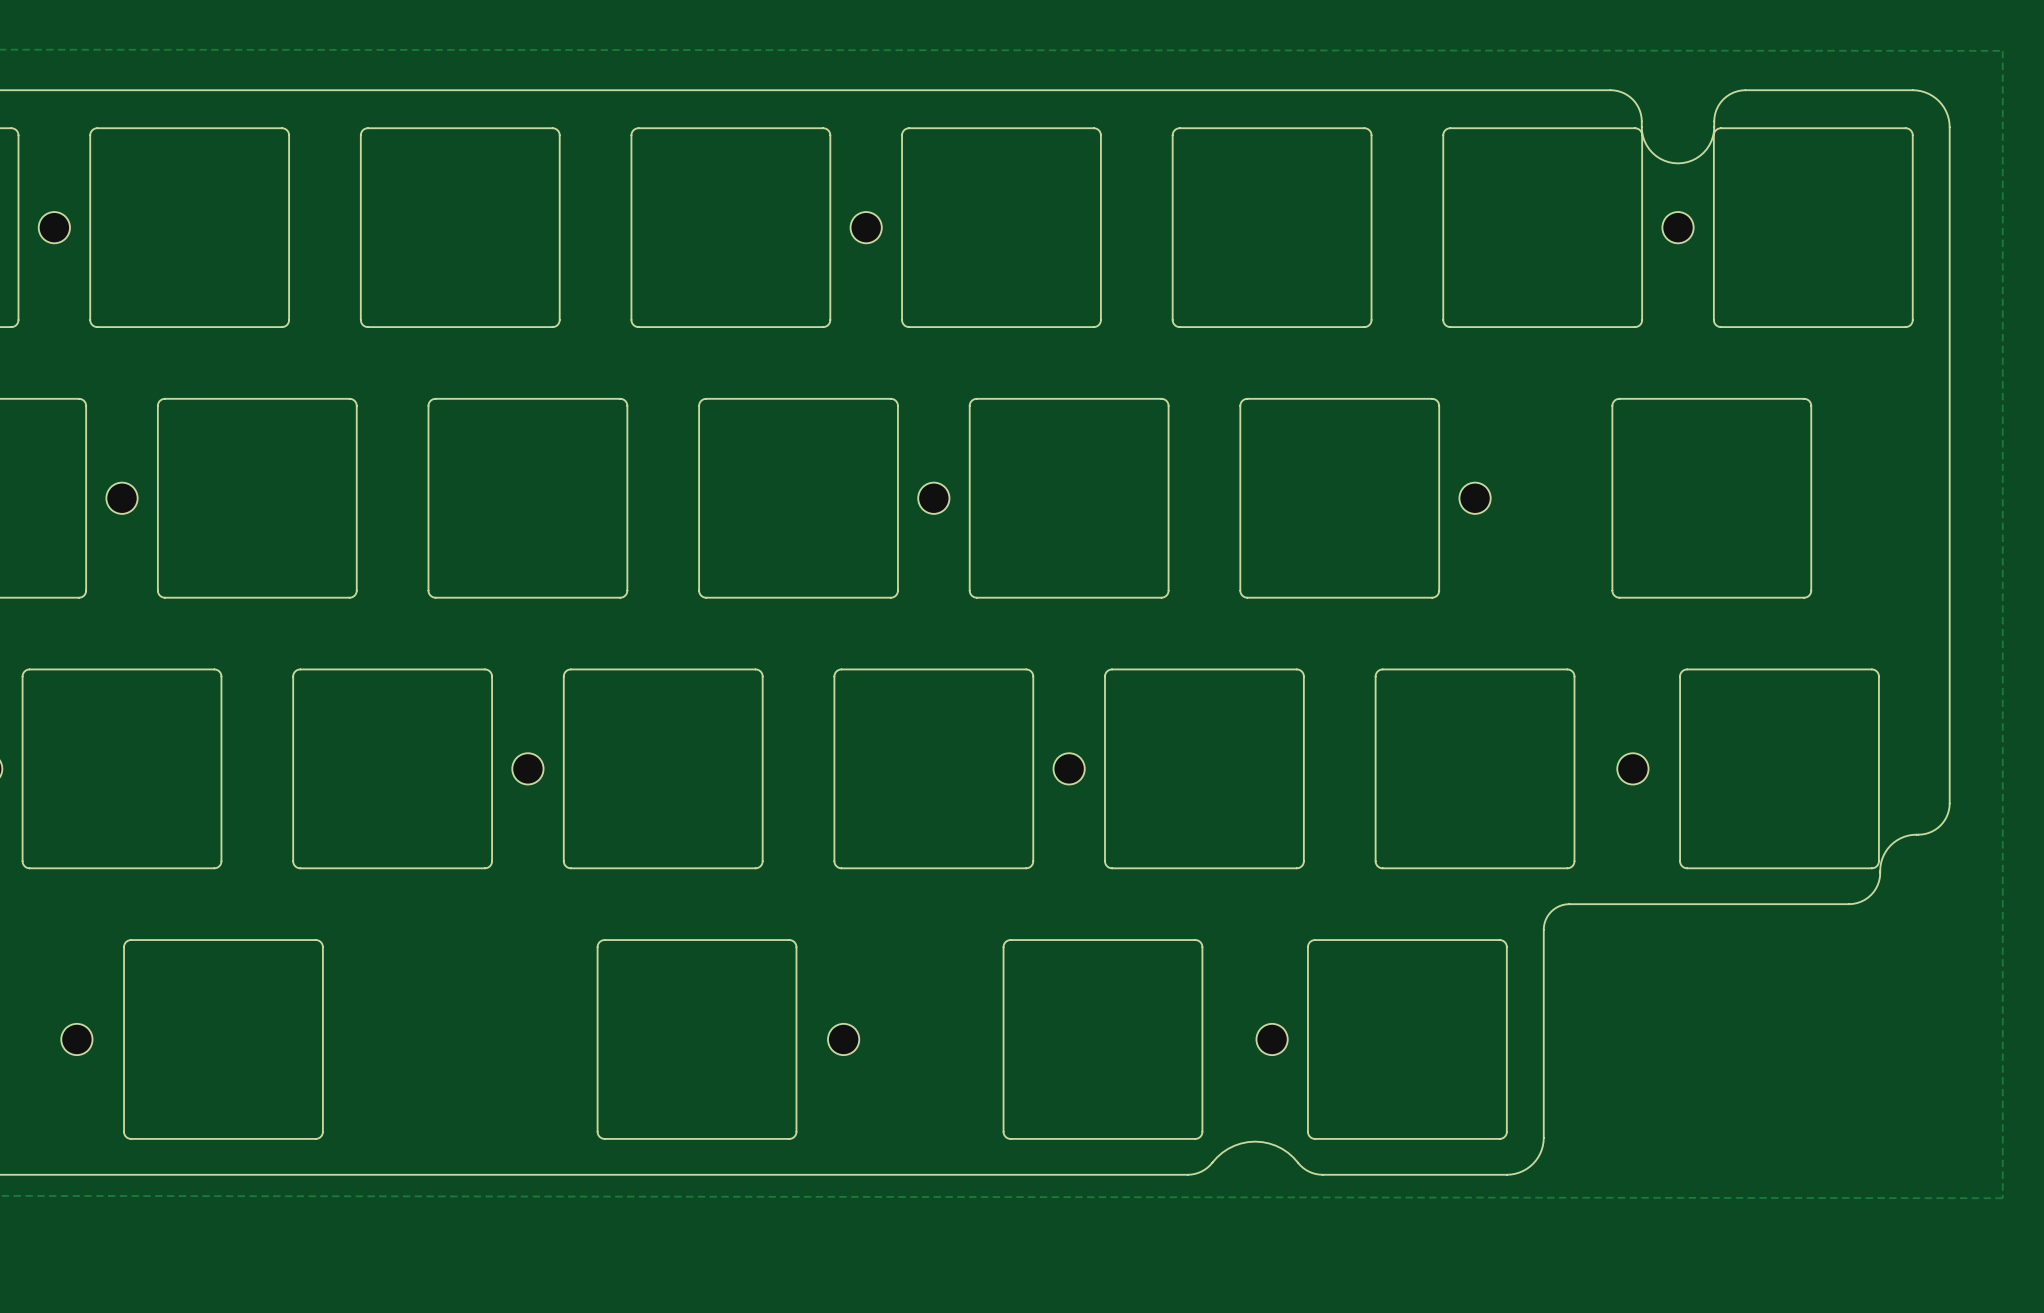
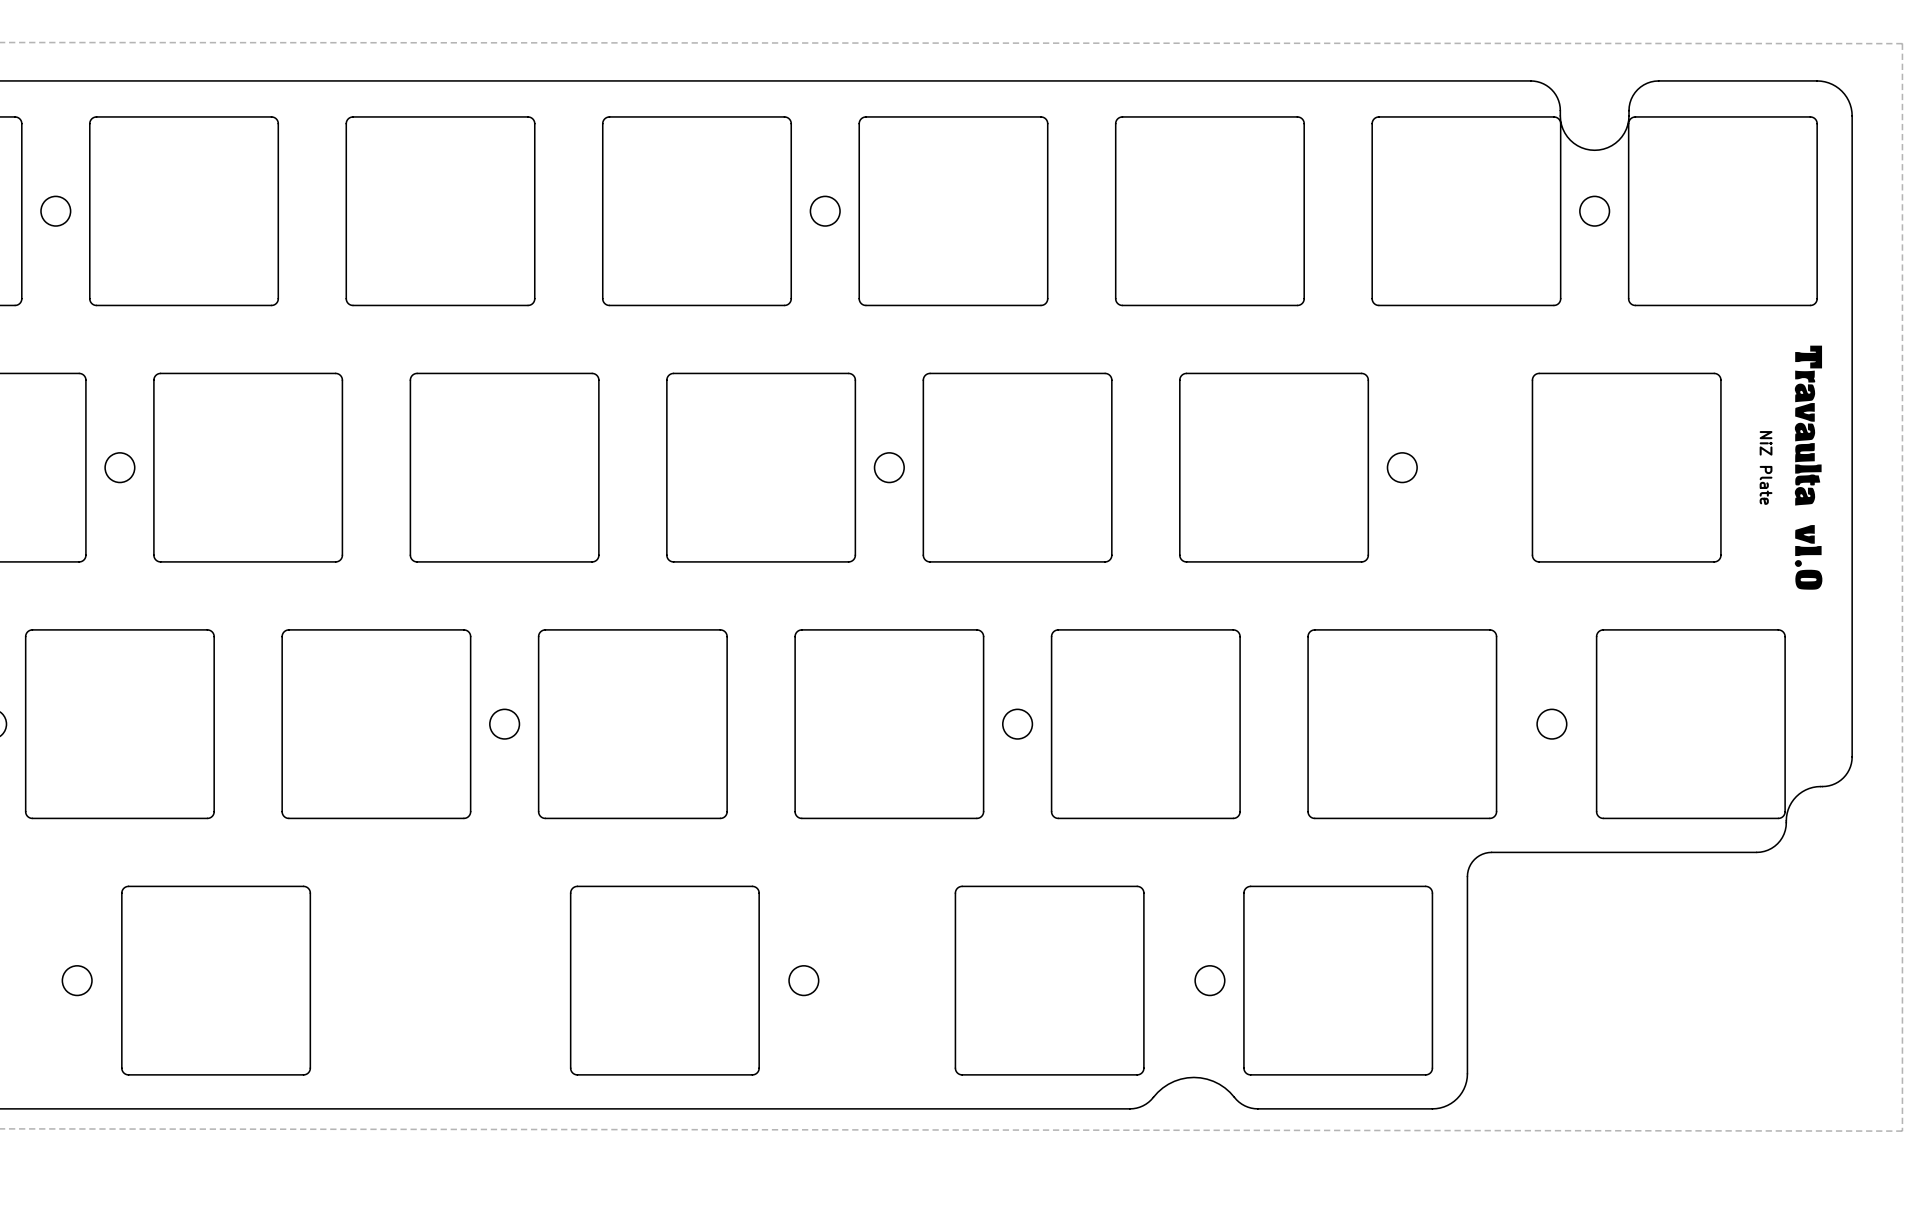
drawing: none -> [1794, 345, 1823, 590]
text: none -> NiZ Plate (1766, 467)

